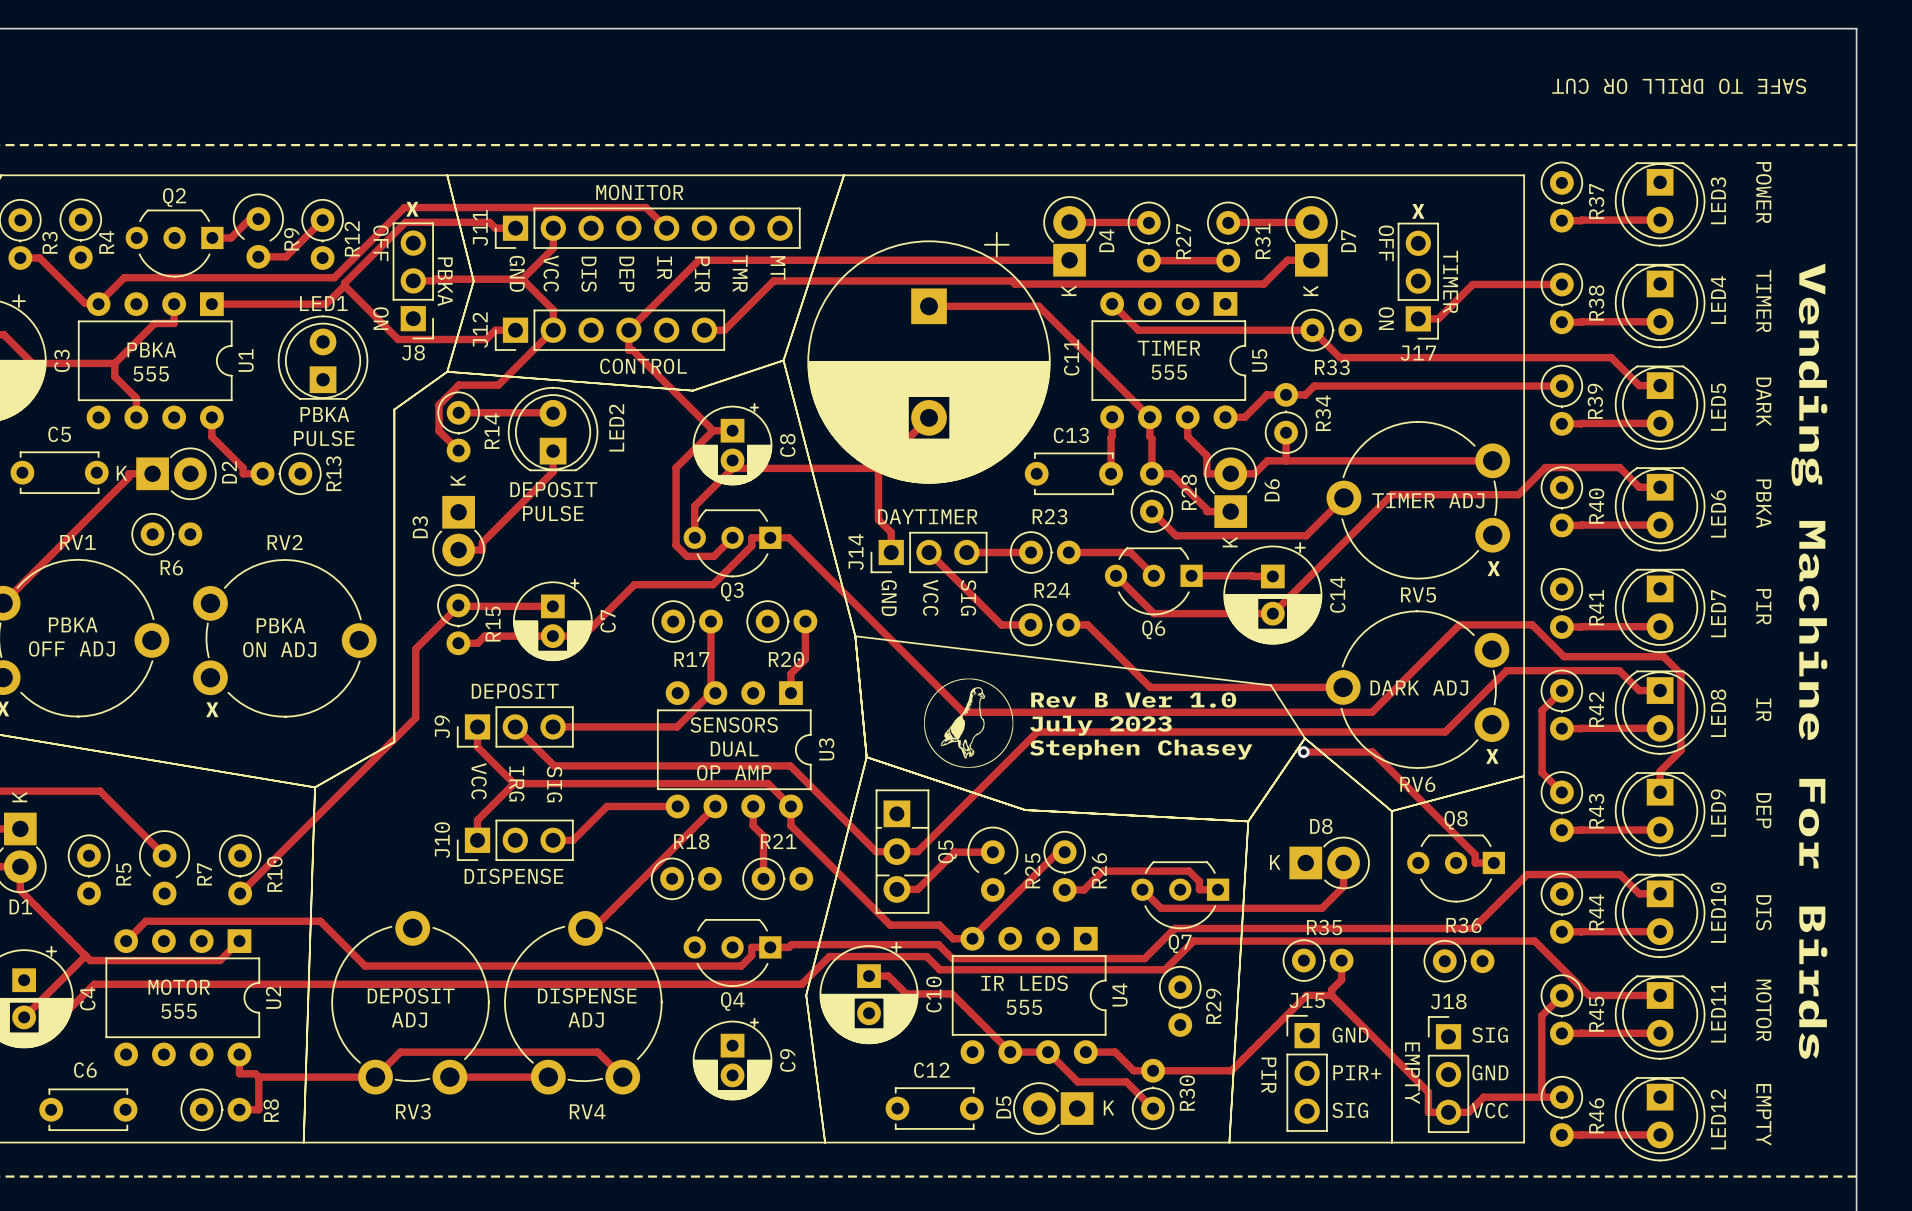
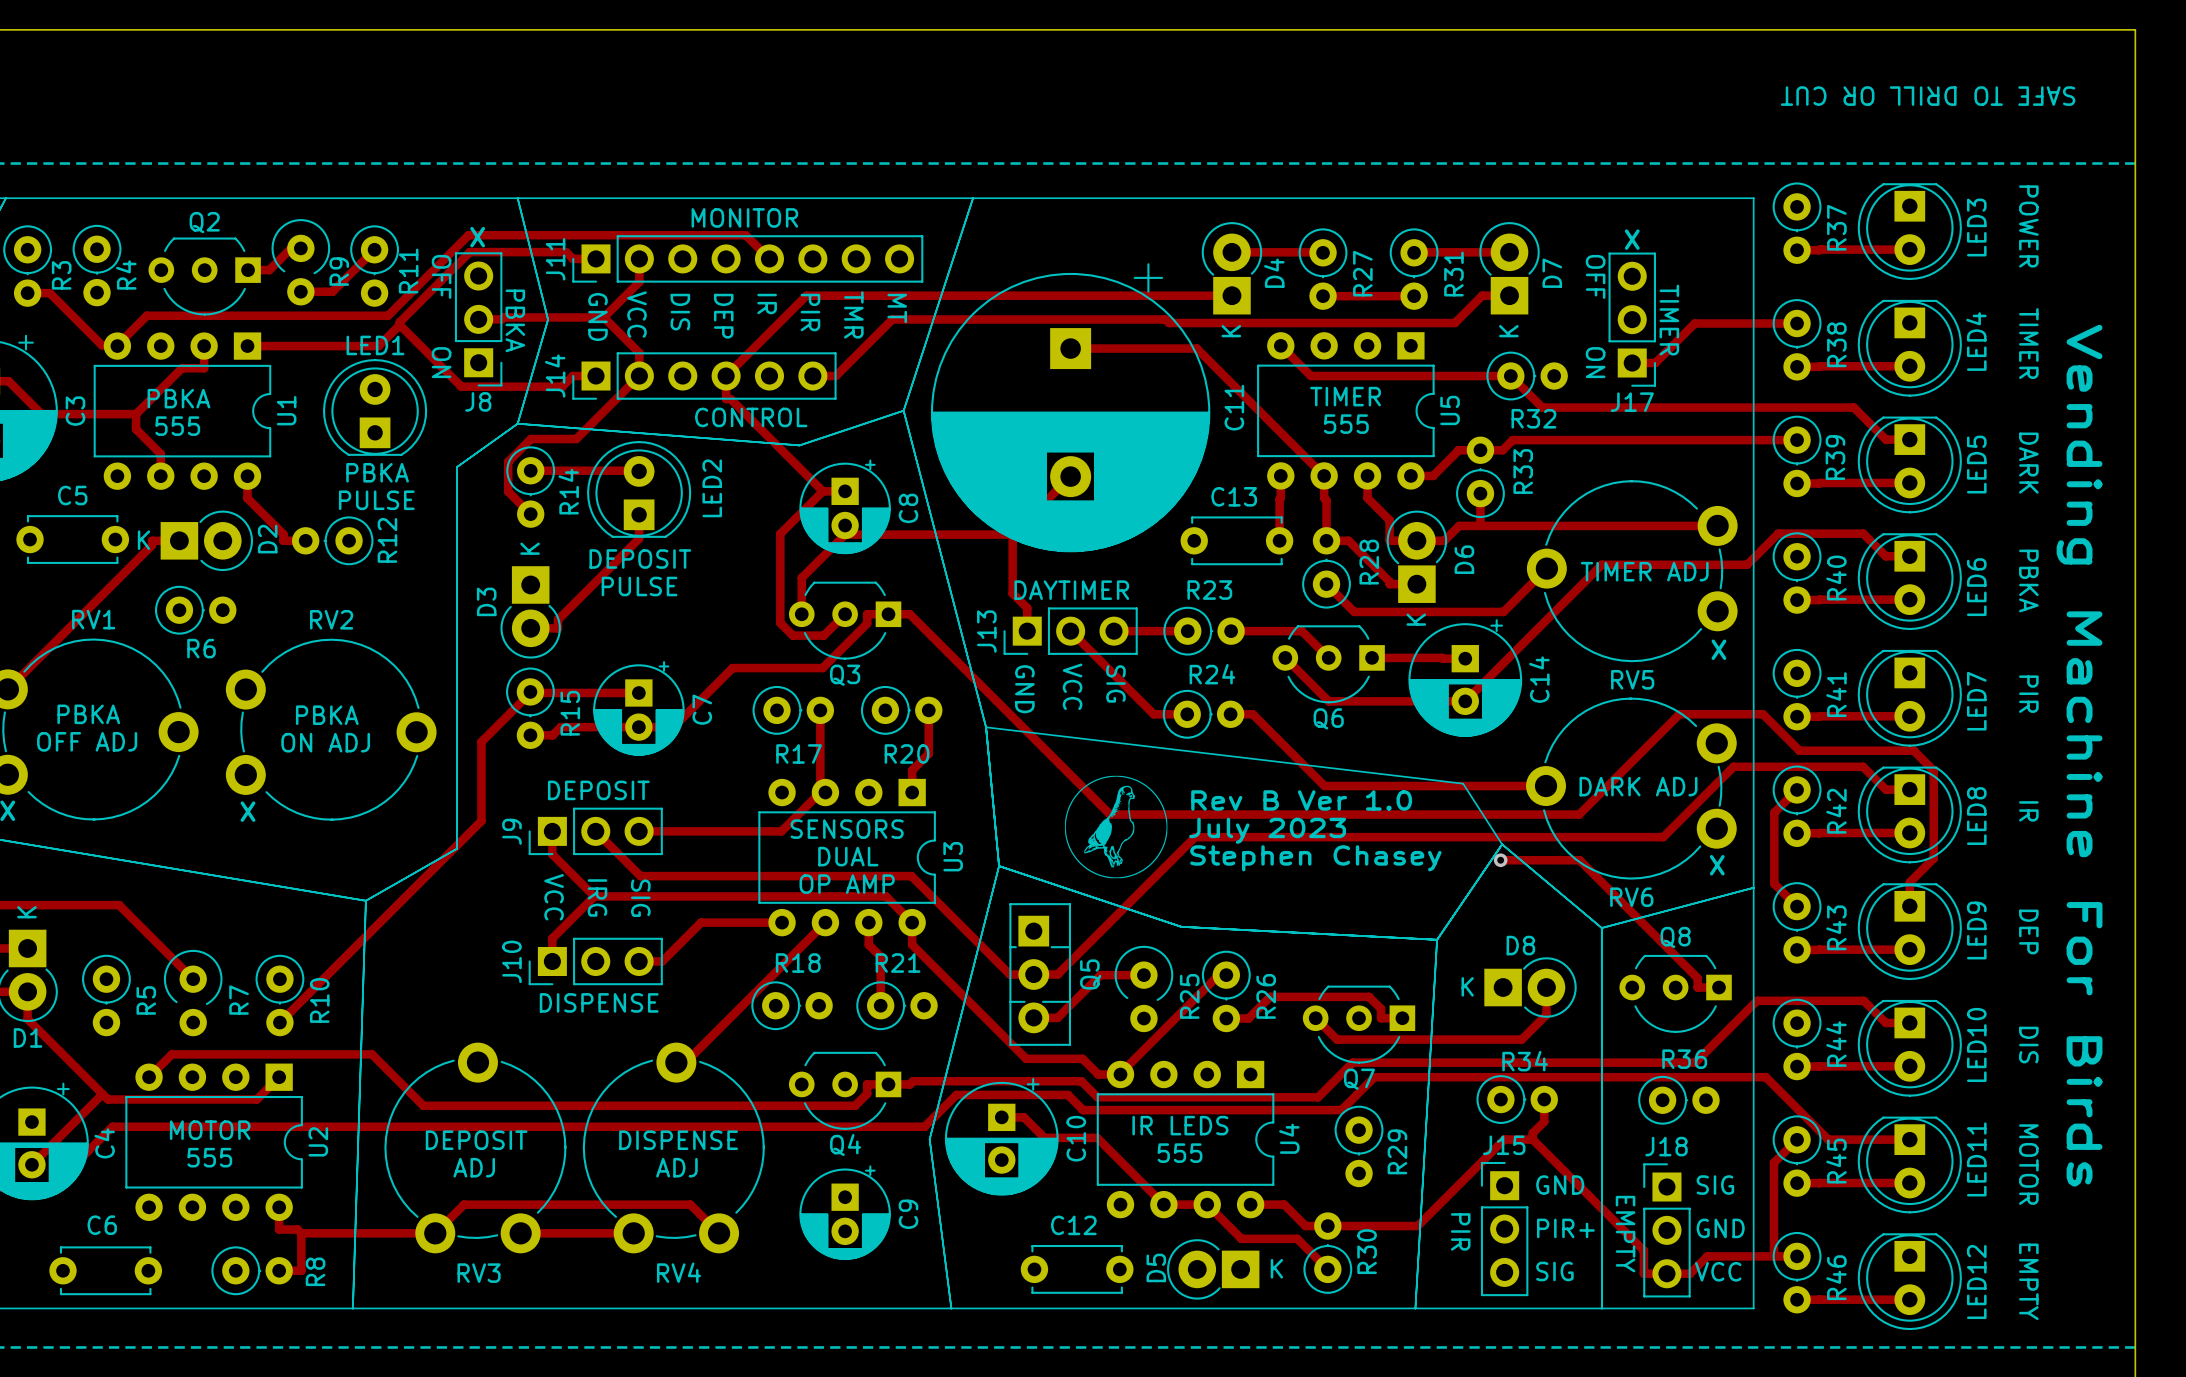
R12 name: R12 (352, 238) -> R11 (408, 271)
J12 name: J12 (480, 330) -> J14 (555, 376)
R33 name: R33 (1332, 367) -> R32 (1533, 418)
R34 name: R34 (1323, 413) -> R33 (1523, 471)
R13 name: R13 (333, 473) -> R12 (387, 540)
J14 name: J14 (856, 552) -> J13 (986, 631)
R35 name: R35 (1324, 927) -> R34 (1525, 1061)

